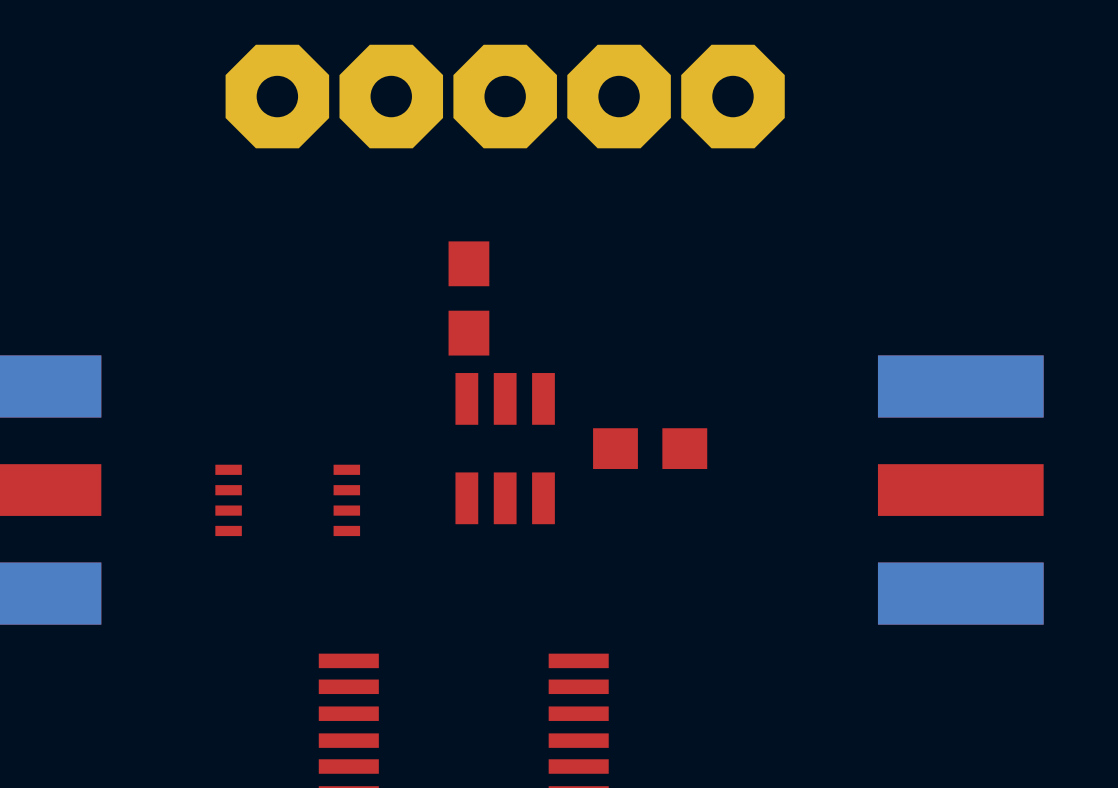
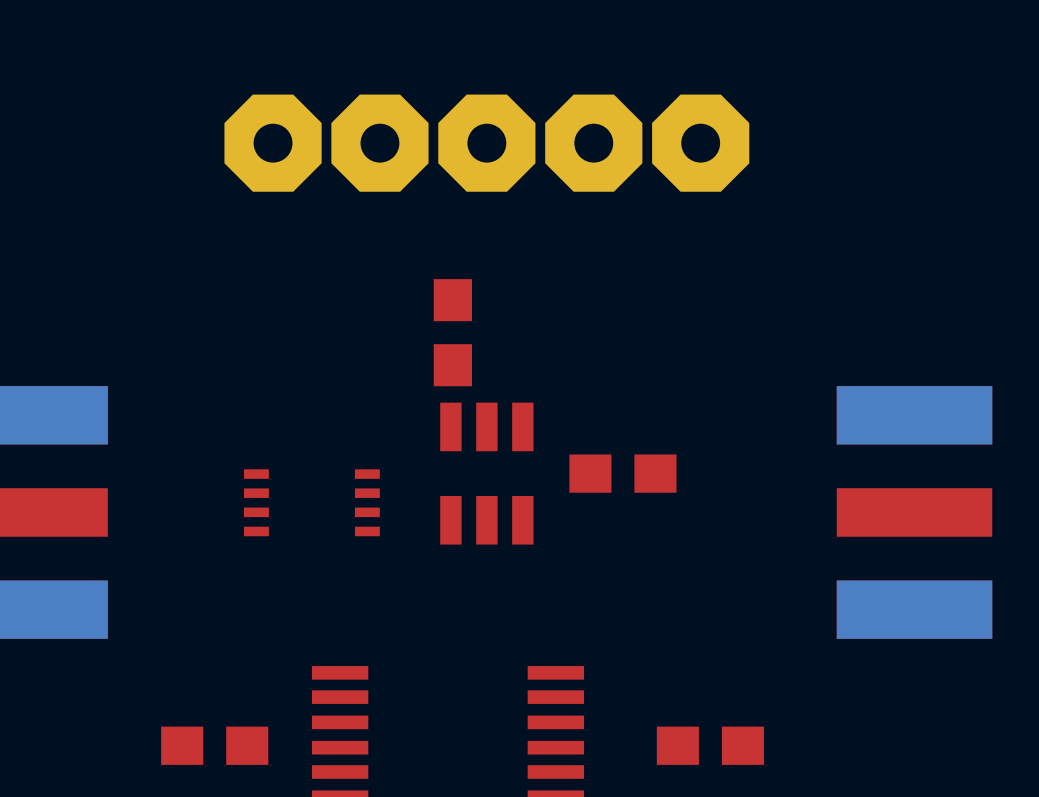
part position: (287, 500) -> (311, 502)
part: none -> (214, 745)
part: none -> (710, 745)

